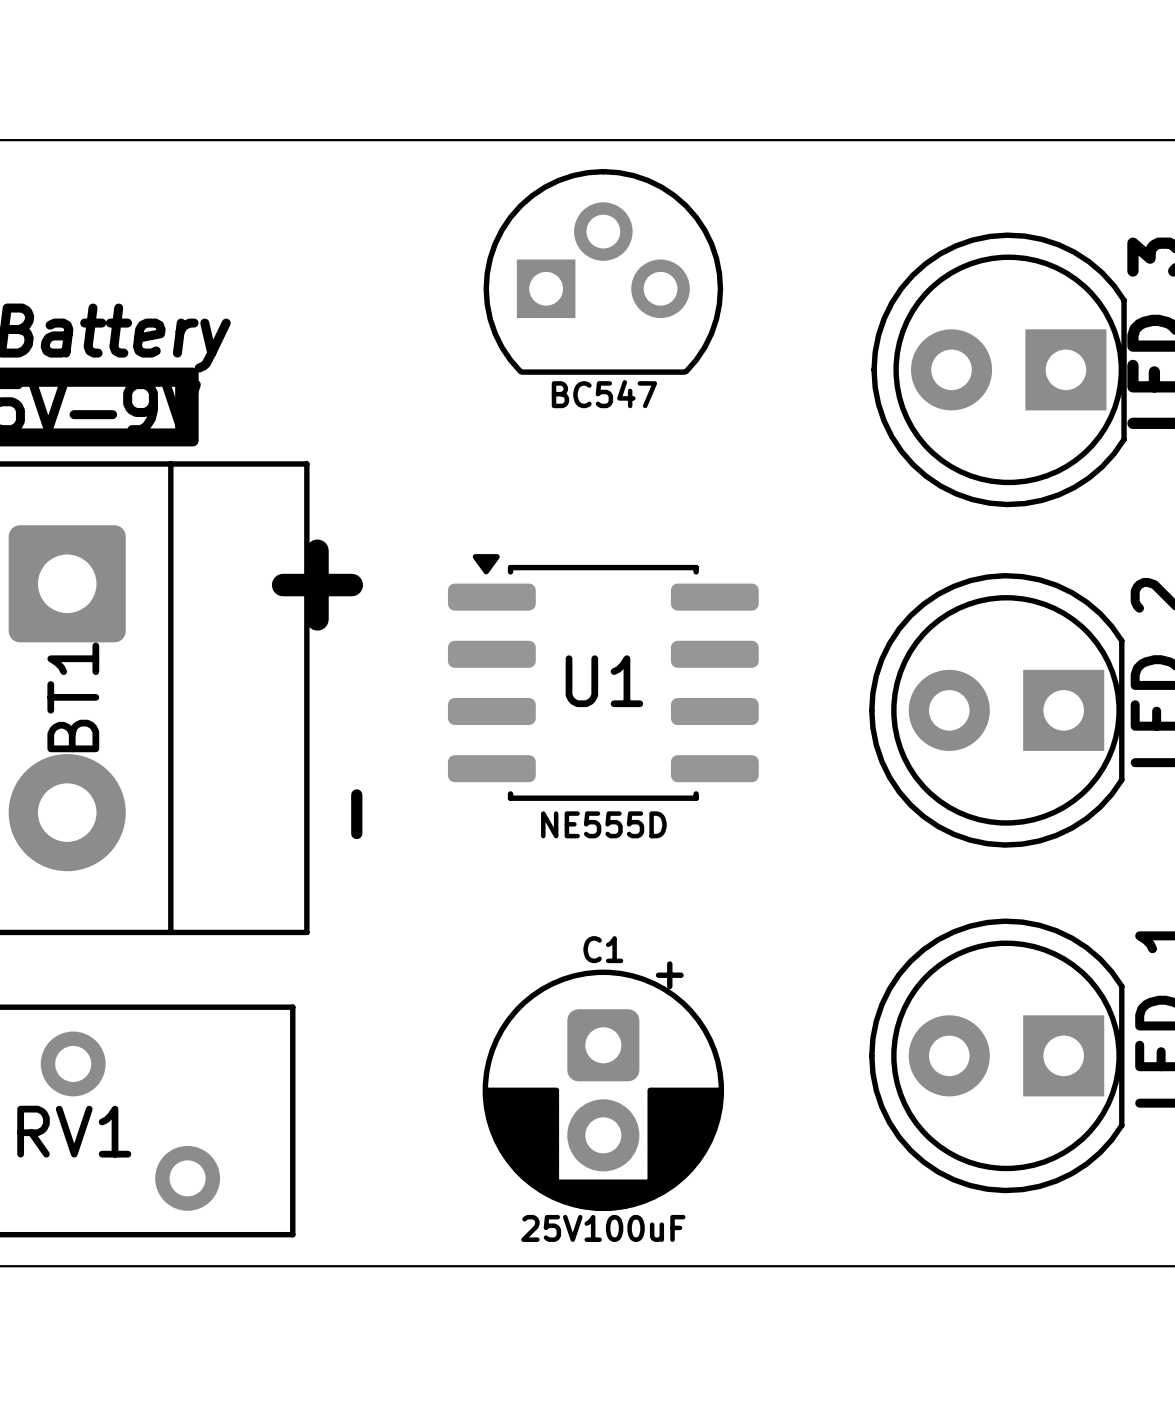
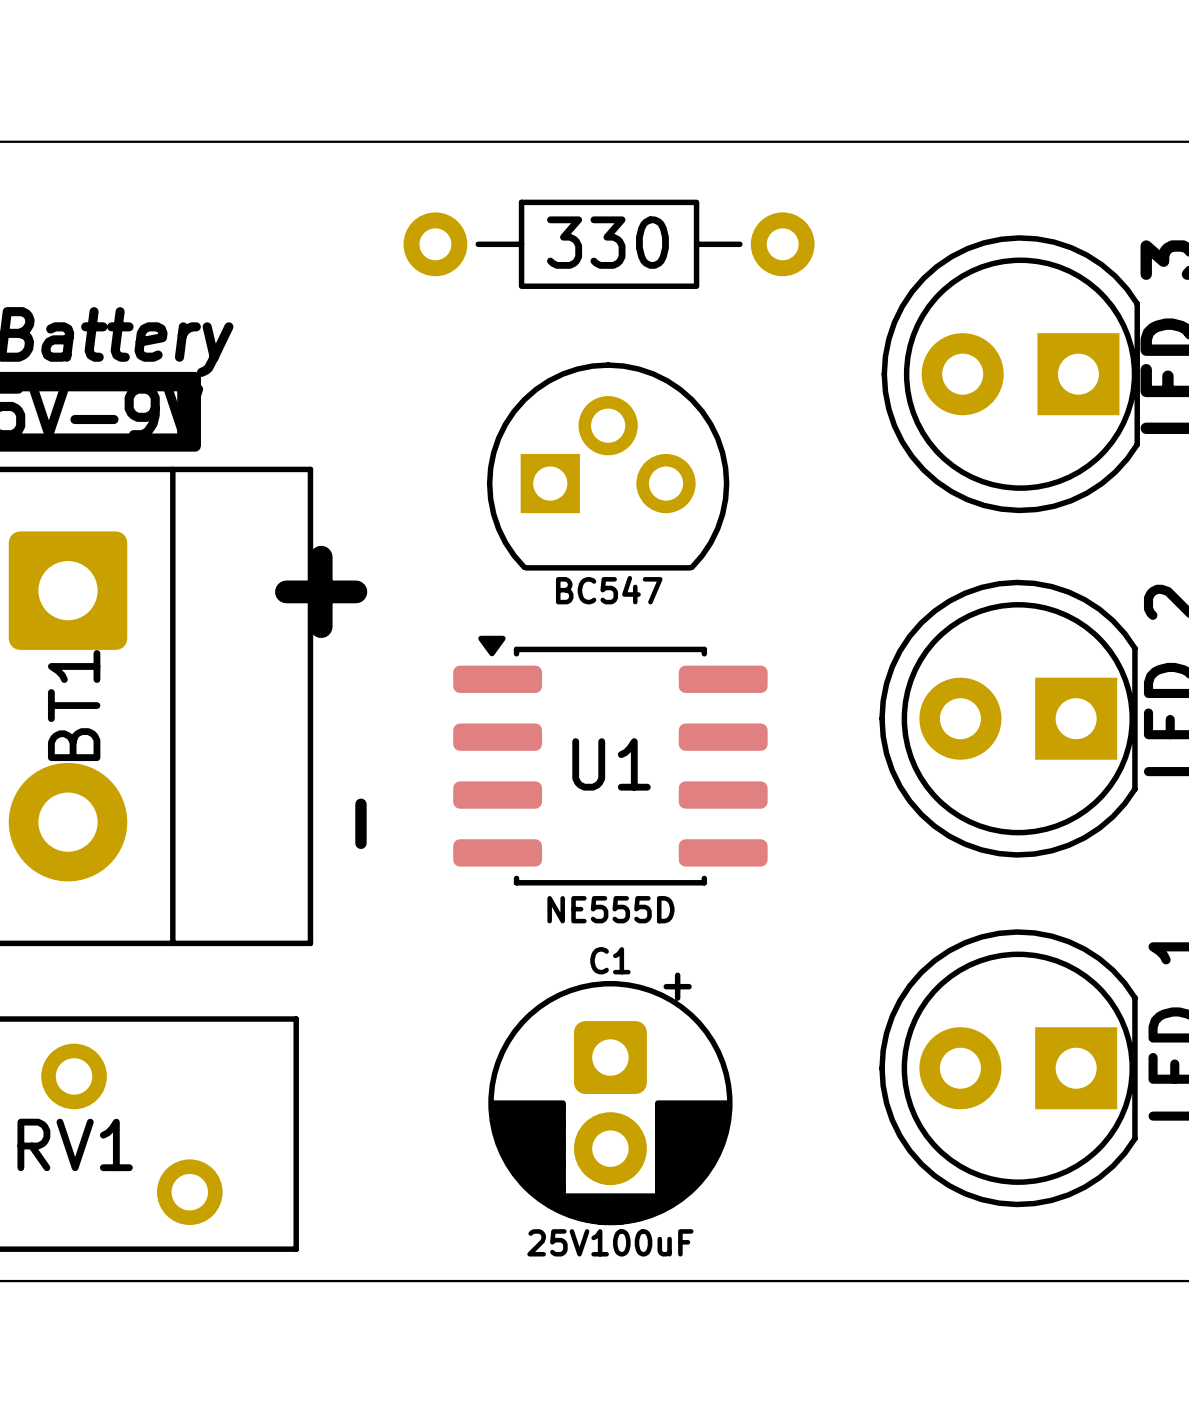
part footprint: [483, 168, 724, 375] -> [403, 199, 815, 289]
part value: BC547 (604, 394) -> 330 (607, 242)
part: none -> BC547 (608, 466)
U1 position: (603, 677) -> (610, 760)

